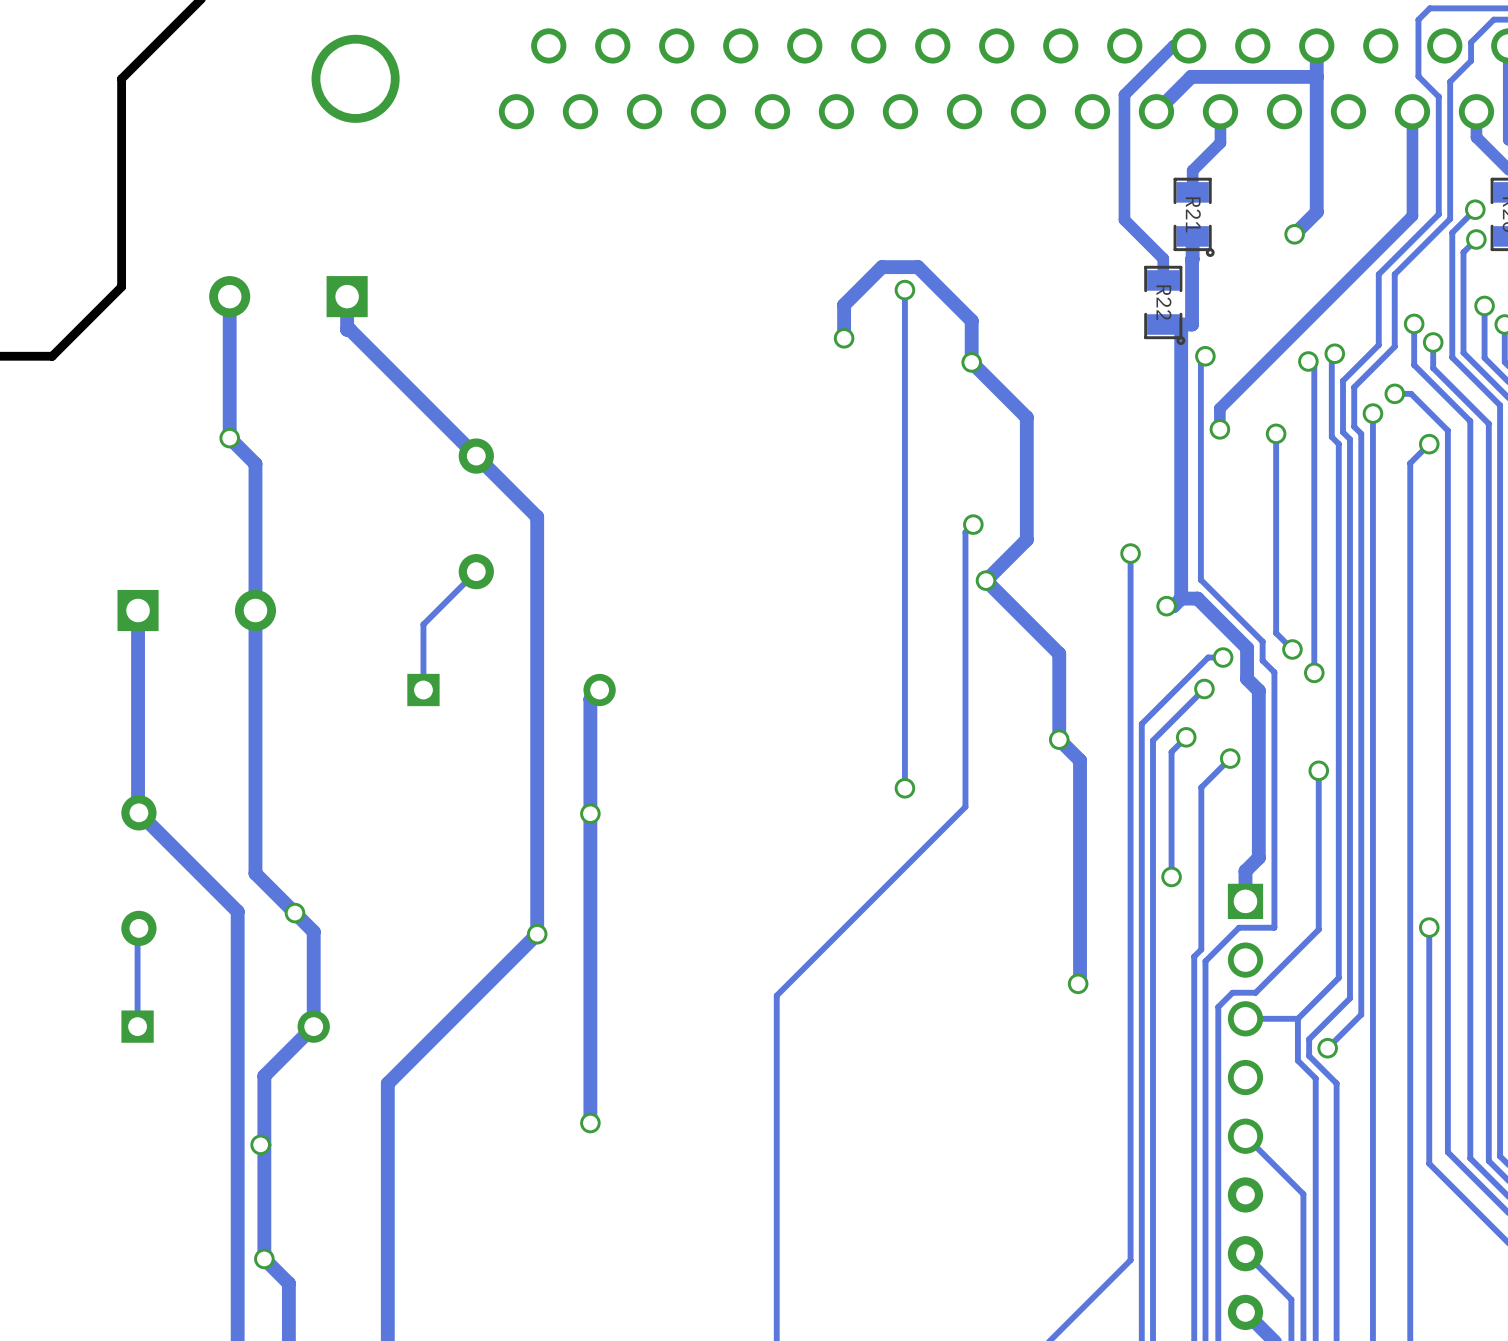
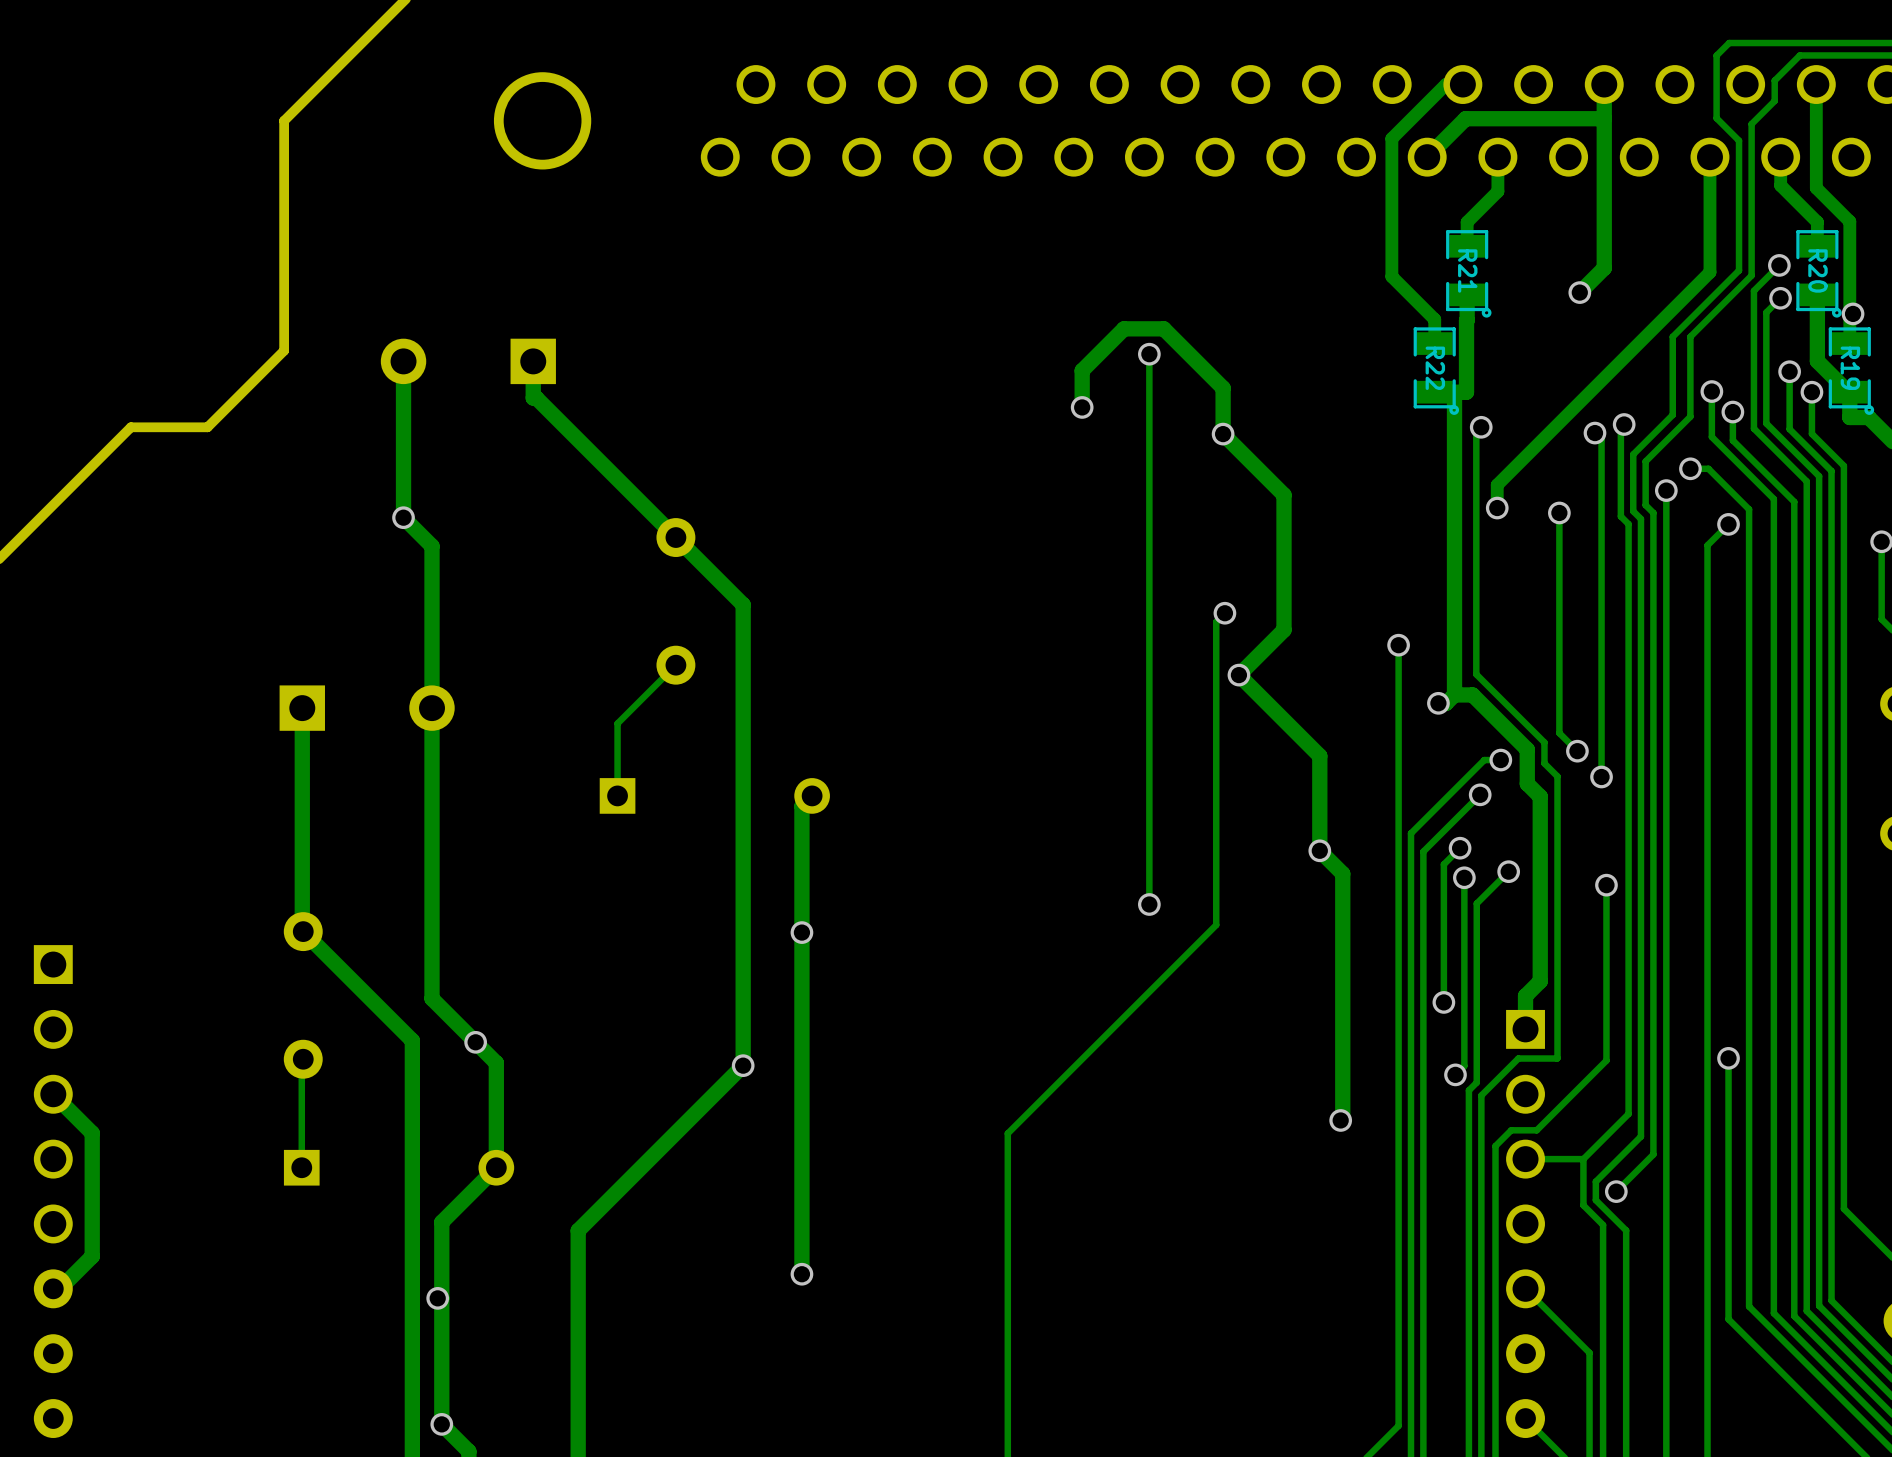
track: none -> (1464, 877) (1464, 1065) (1455, 1074)
via: none -> (1464, 877)
via: none -> (1455, 1074)

